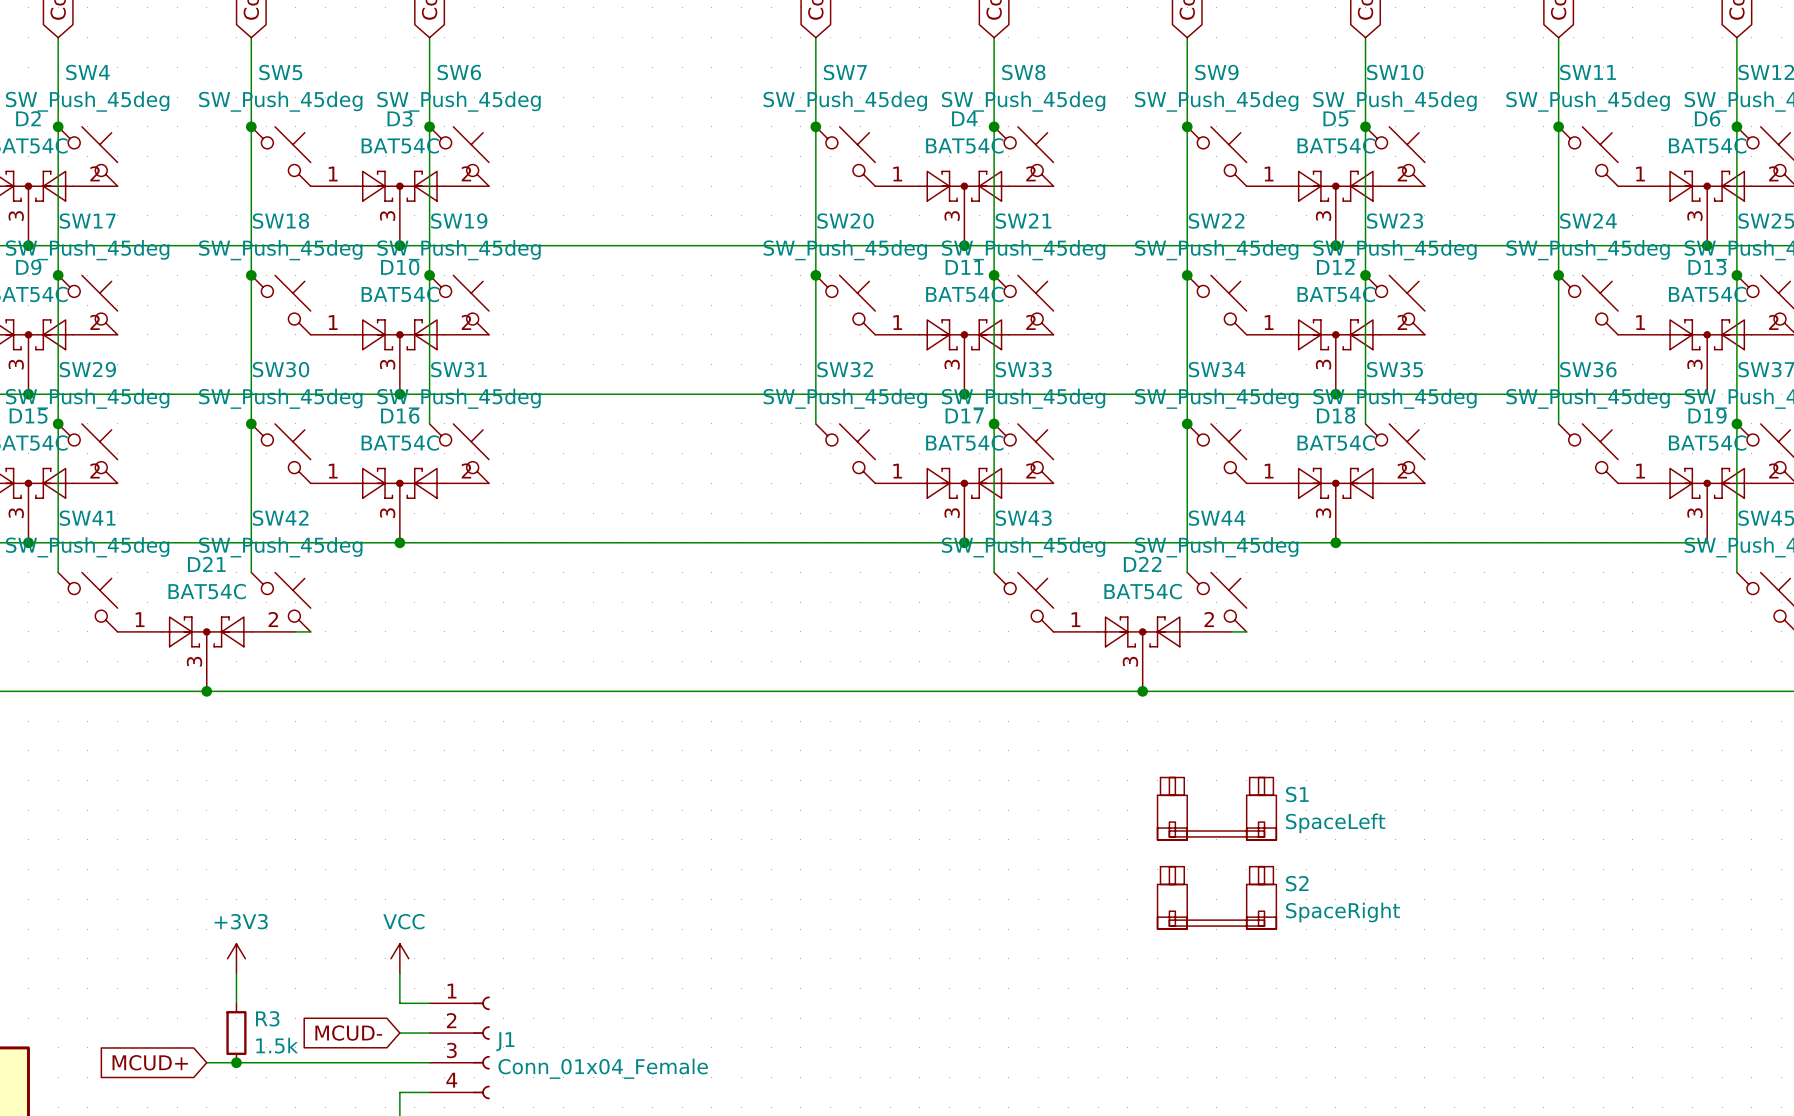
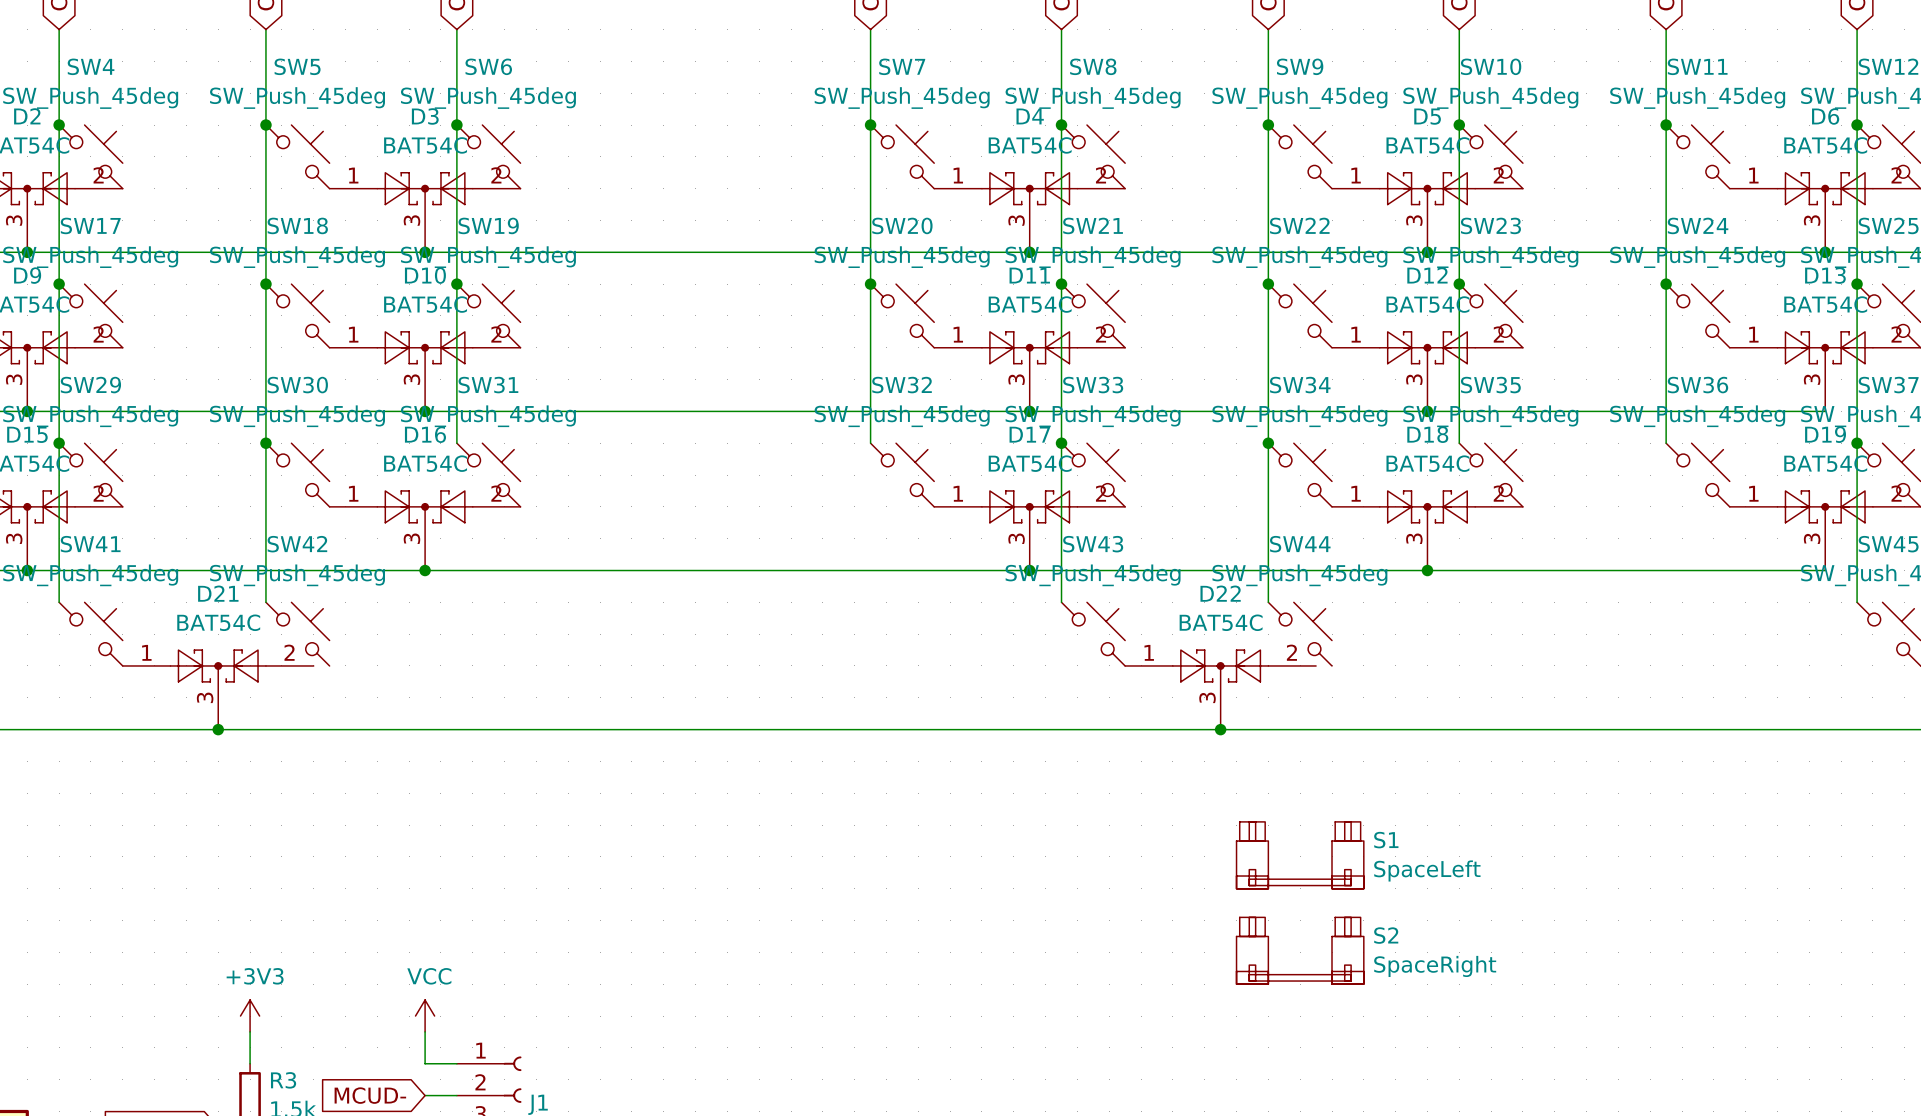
wire: (295, 631) (310, 631) -> none
wire: (1231, 631) (1246, 631) -> none

